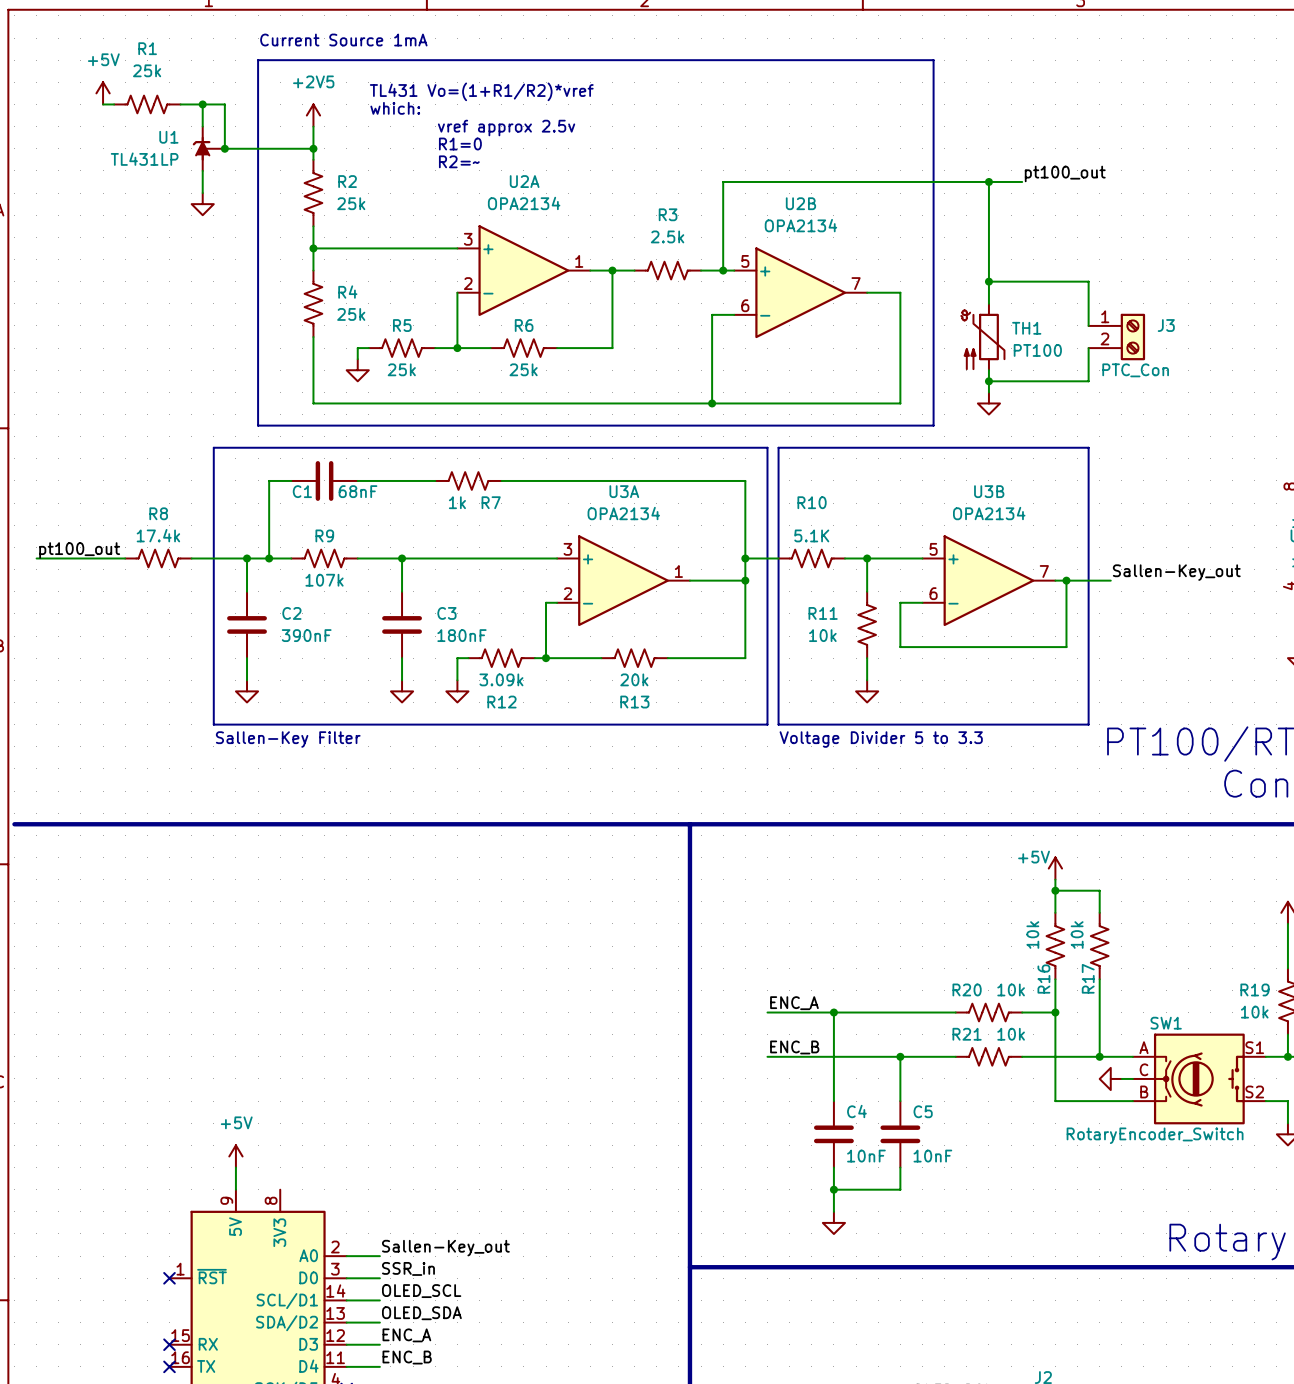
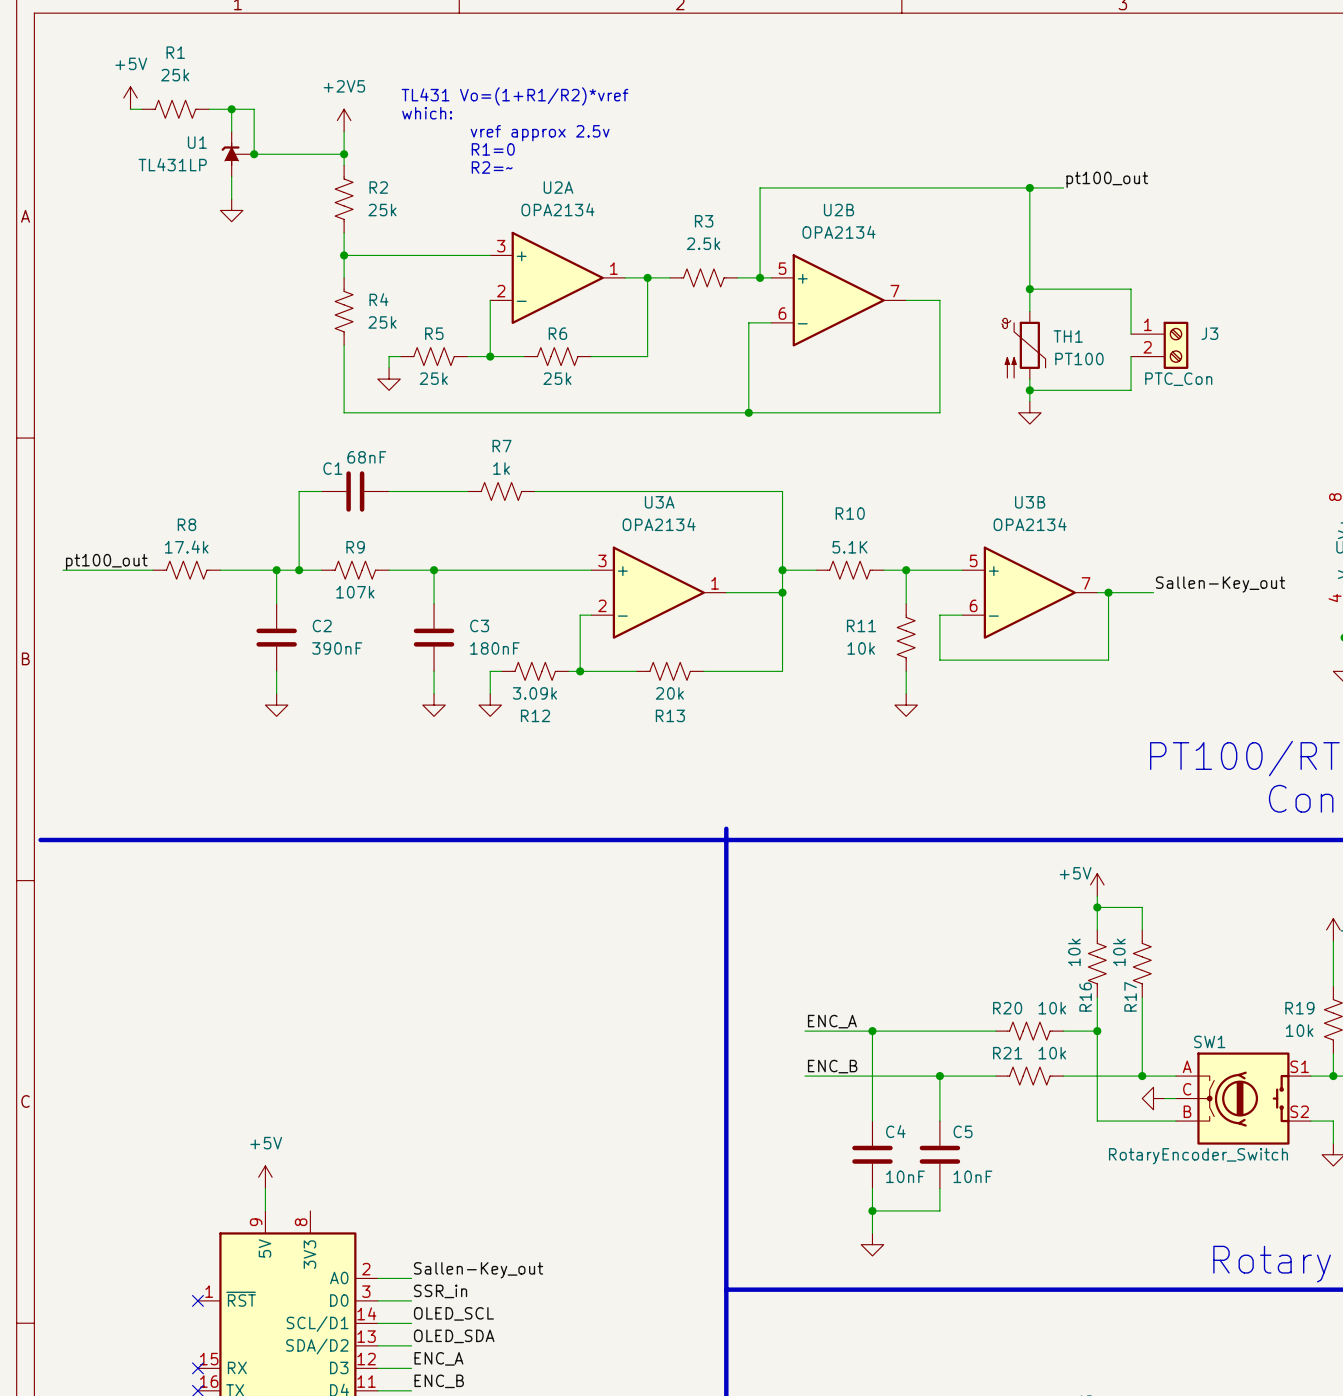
text: Current Source 1mA (343, 40) -> none
line: (258, 60) (933, 60) (933, 425) (258, 425) (258, 60) -> none
line: (213, 447) (767, 447) (767, 724) (213, 724) (213, 447) -> none
line: (778, 447) (1088, 447) (1088, 724) (778, 724) (778, 447) -> none
C1 name position: C1 (302, 491) -> C1 (332, 468)
C1 value position: 68nF (358, 491) -> 68nF (366, 457)
R7 value position: 1k (457, 502) -> 1k (501, 468)
R7 name position: R7 (491, 502) -> R7 (502, 446)
text: Sallen-Key Filter (288, 739) -> none
text: Voltage Divider 5 to 3.3 (881, 739) -> none
line: none -> (726, 828) (726, 839)

